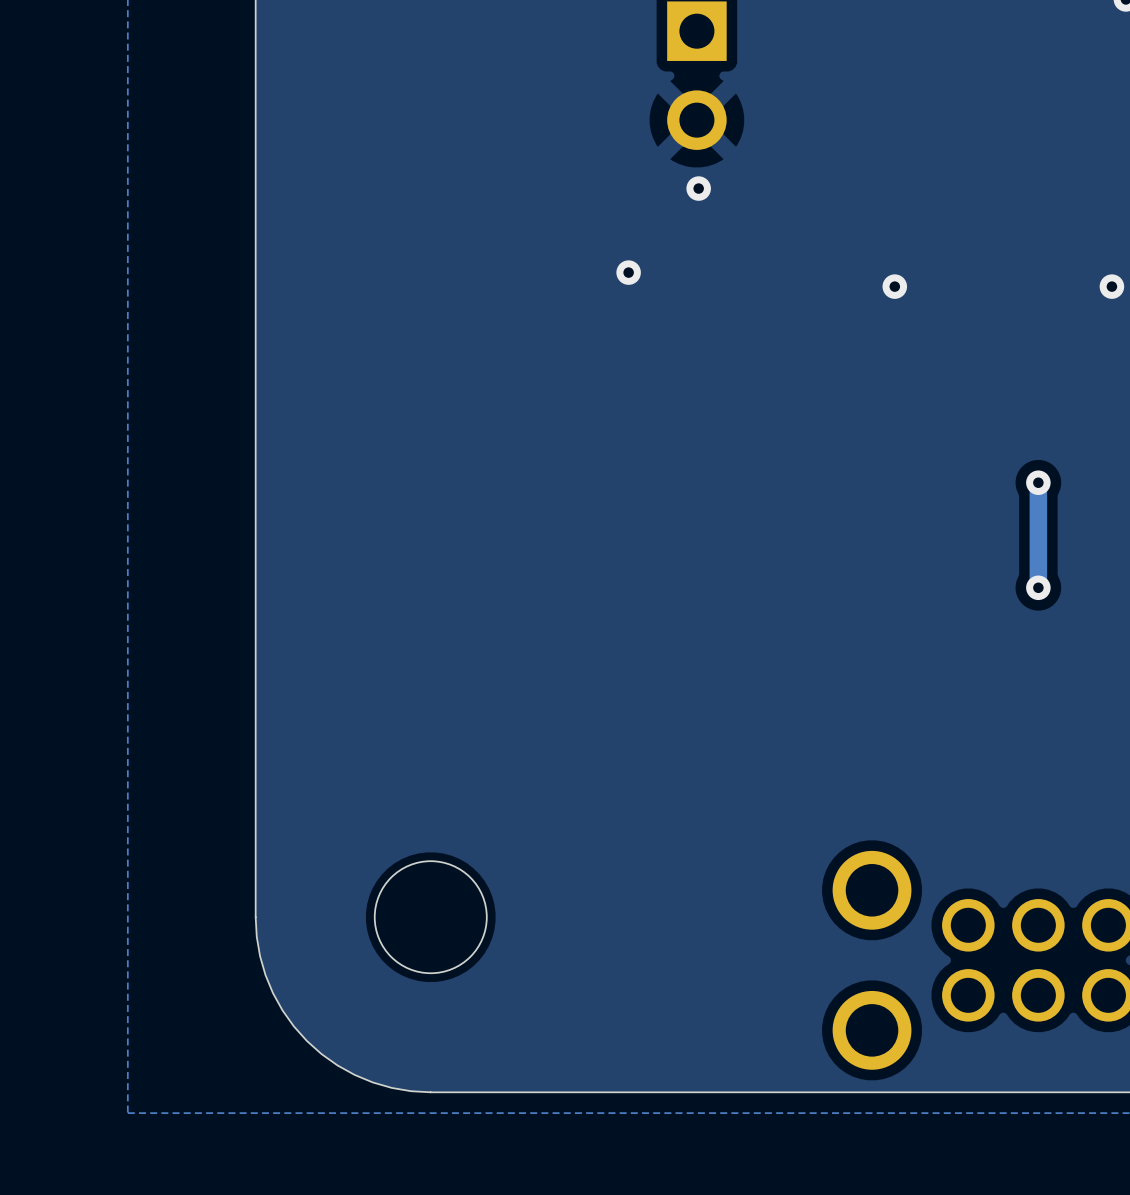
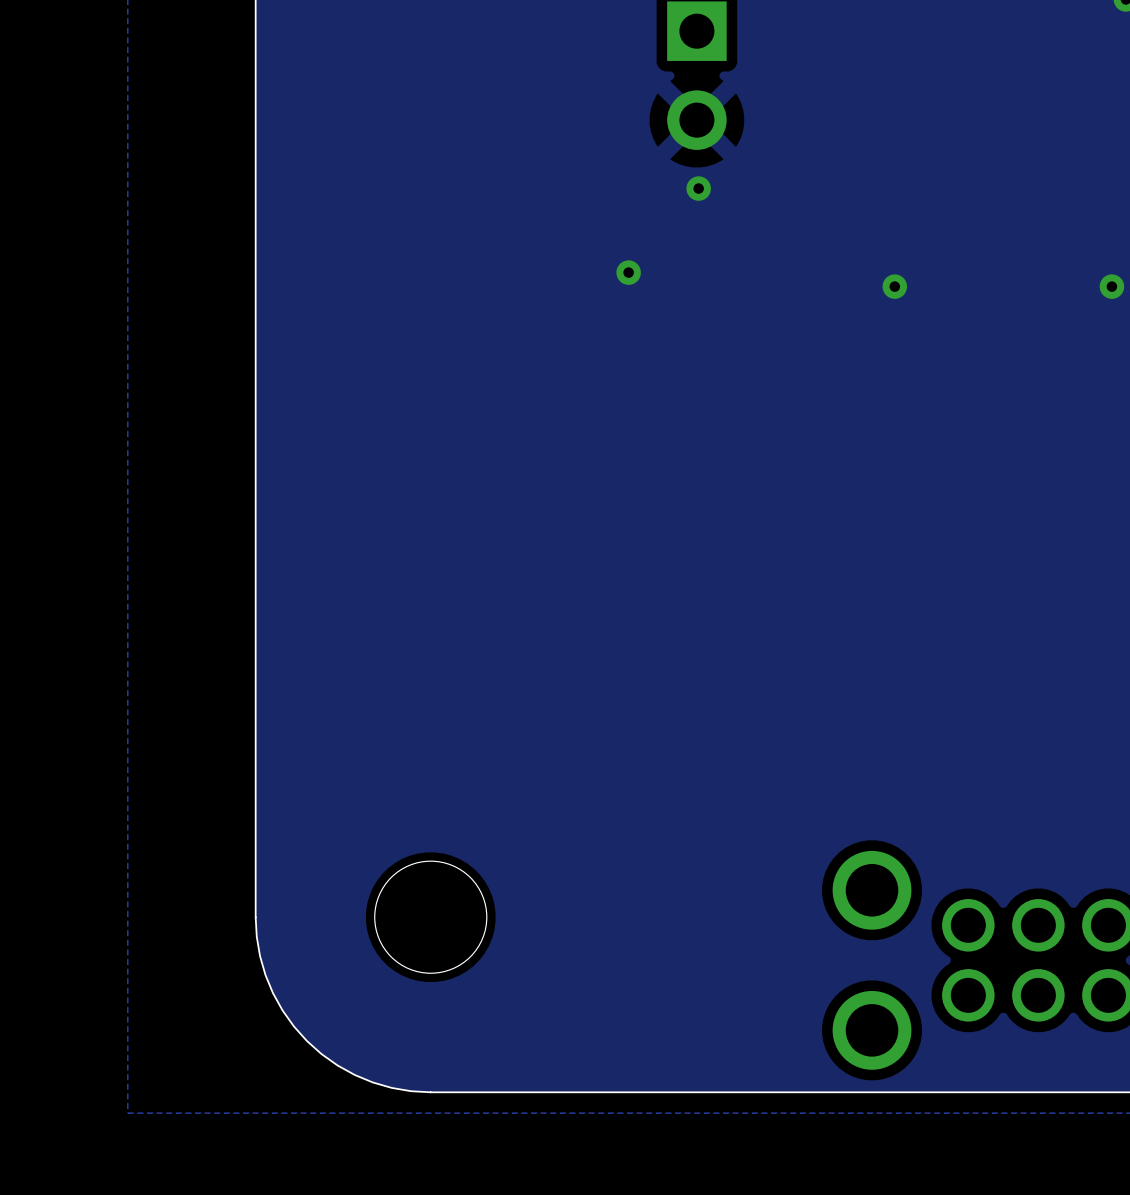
track: (1038, 482) (1038, 587) -> none
via: (1038, 482) -> none
via: (1038, 587) -> none

